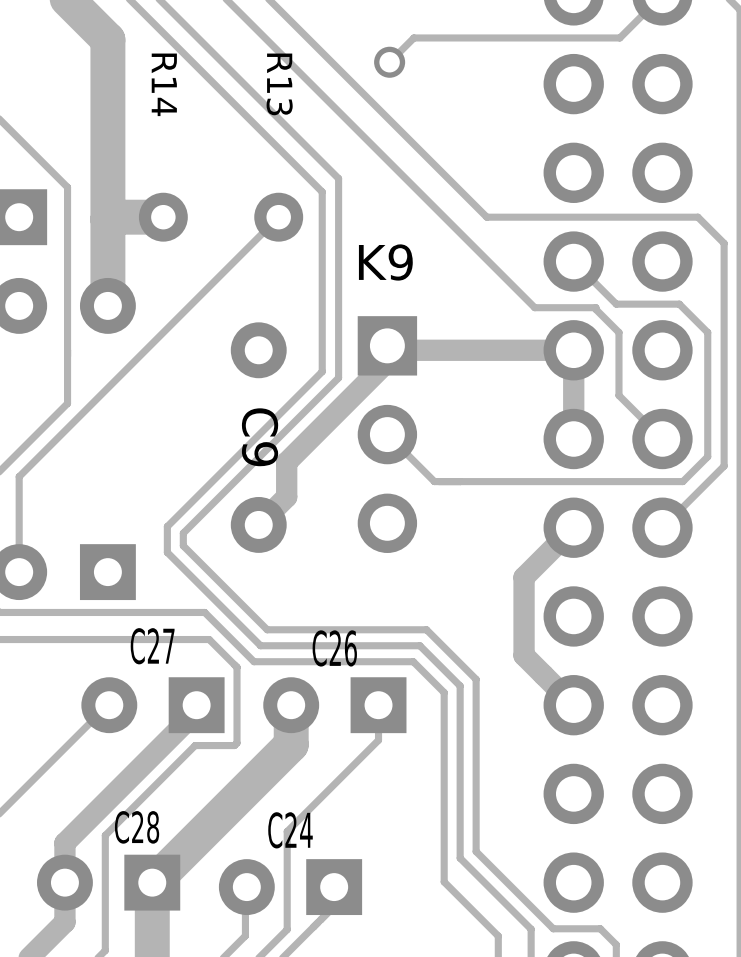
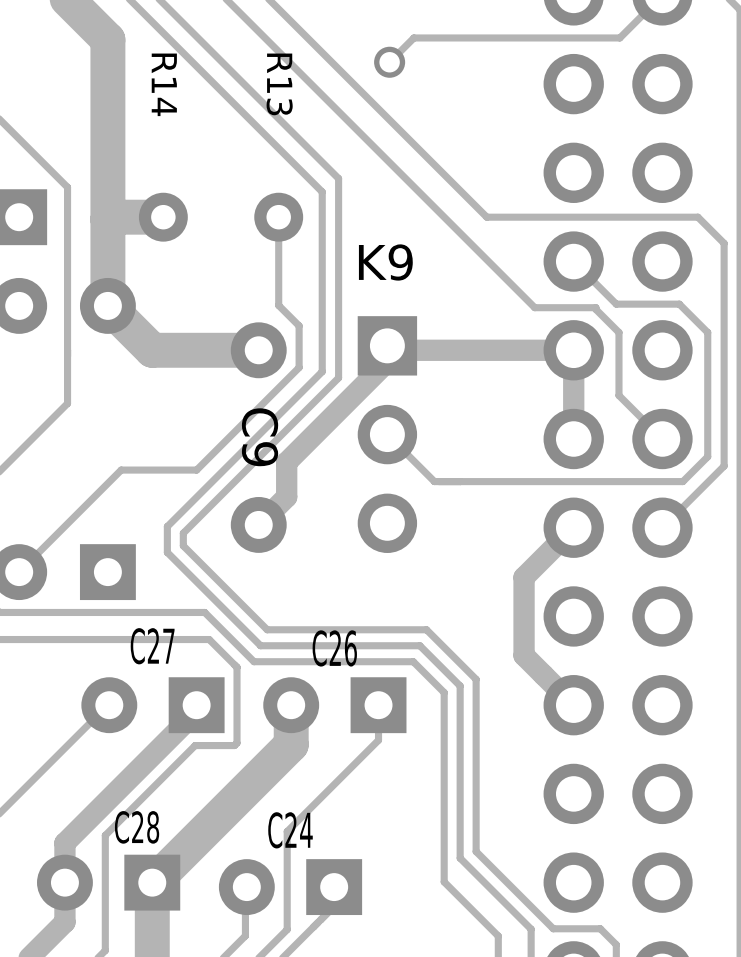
track: (278, 217) (19, 476) (19, 572) -> (278, 217) (278, 305) (299, 325) (299, 367) (196, 470) (121, 470) (19, 572)
track: none -> (128, 328) (107, 305) (152, 350) (258, 350)

